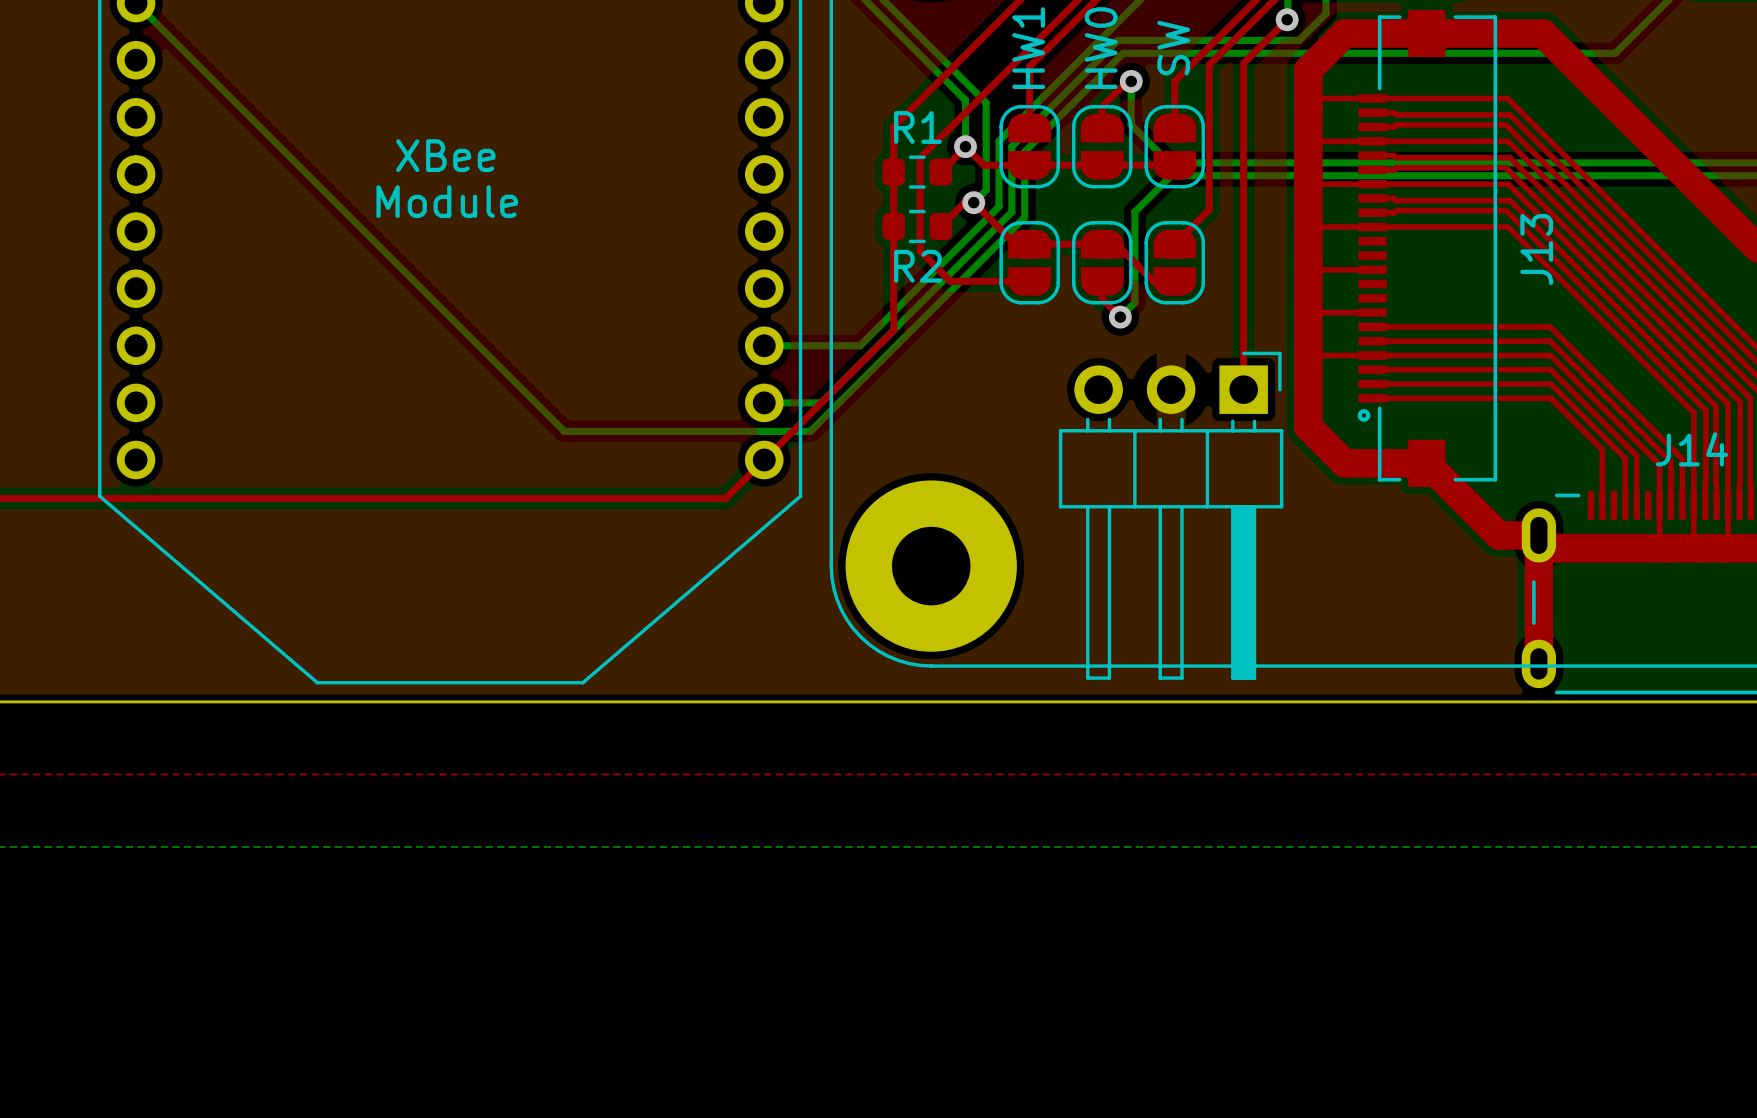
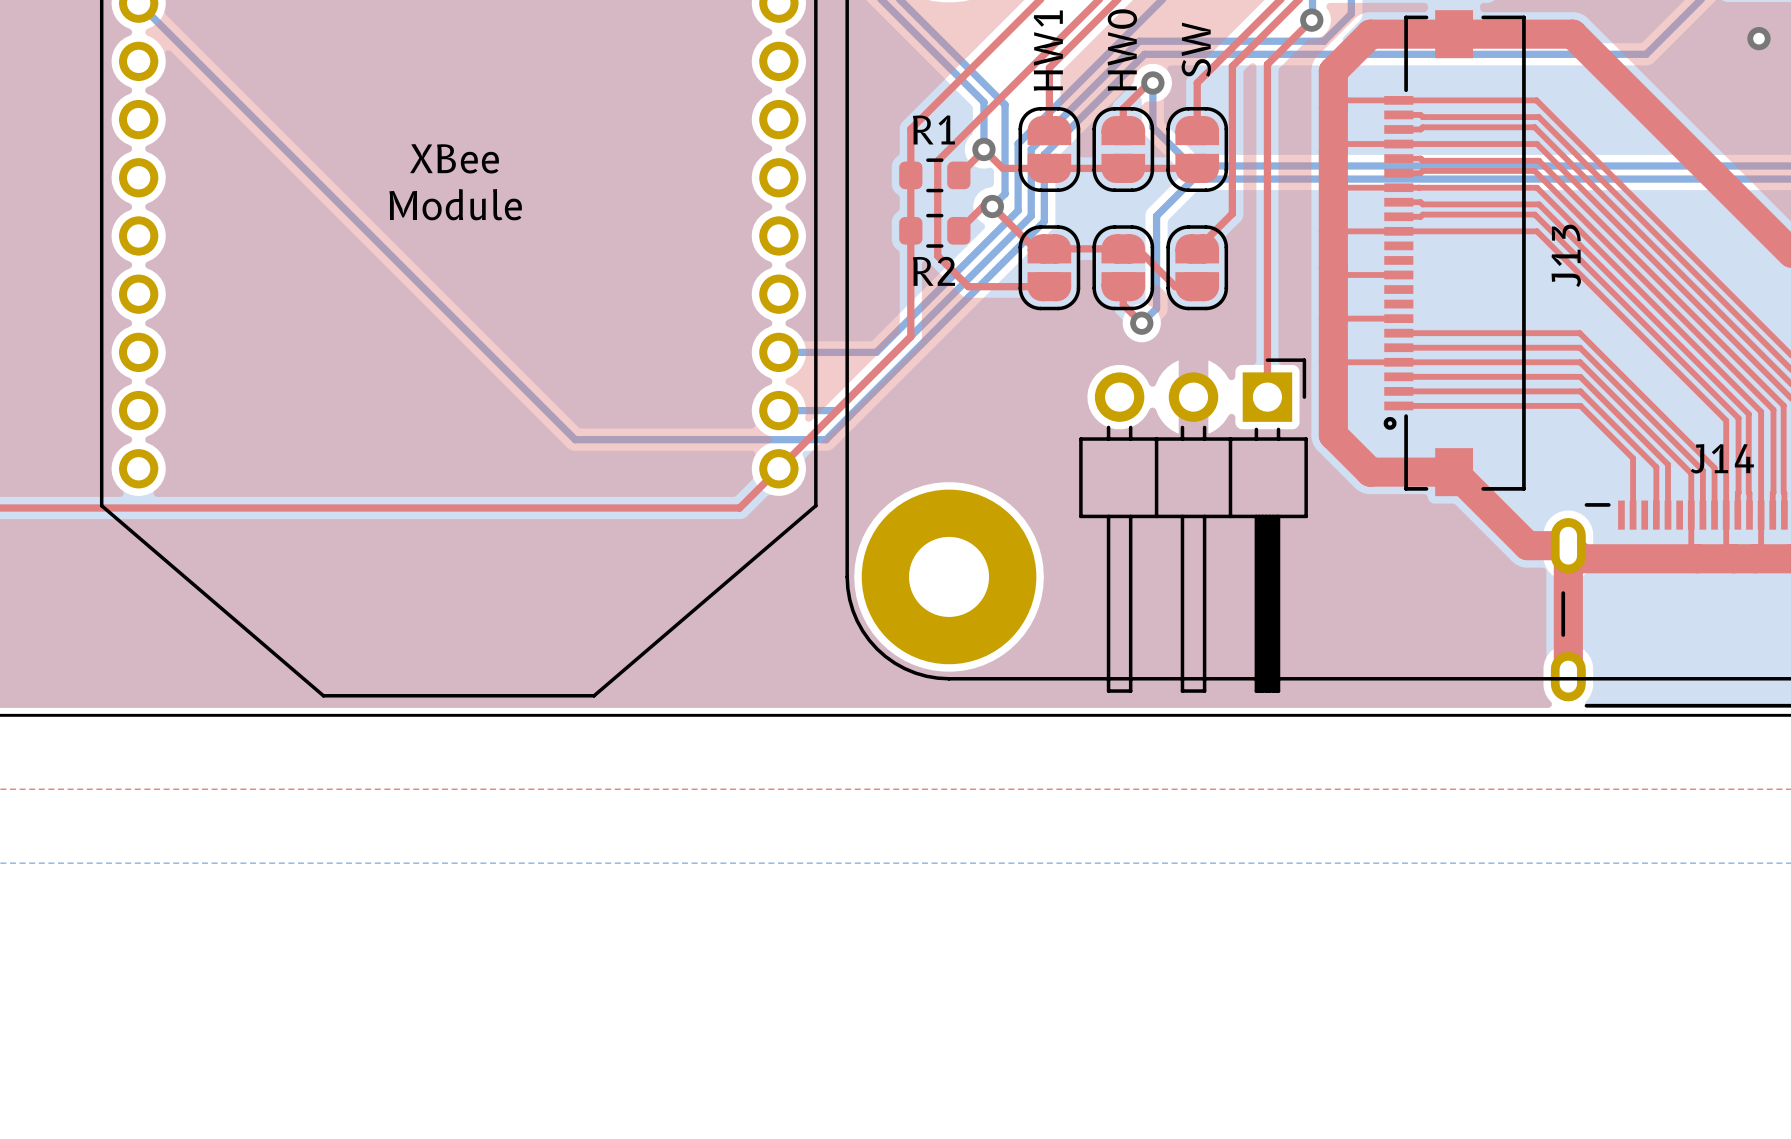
via: none -> (1758, 38)

